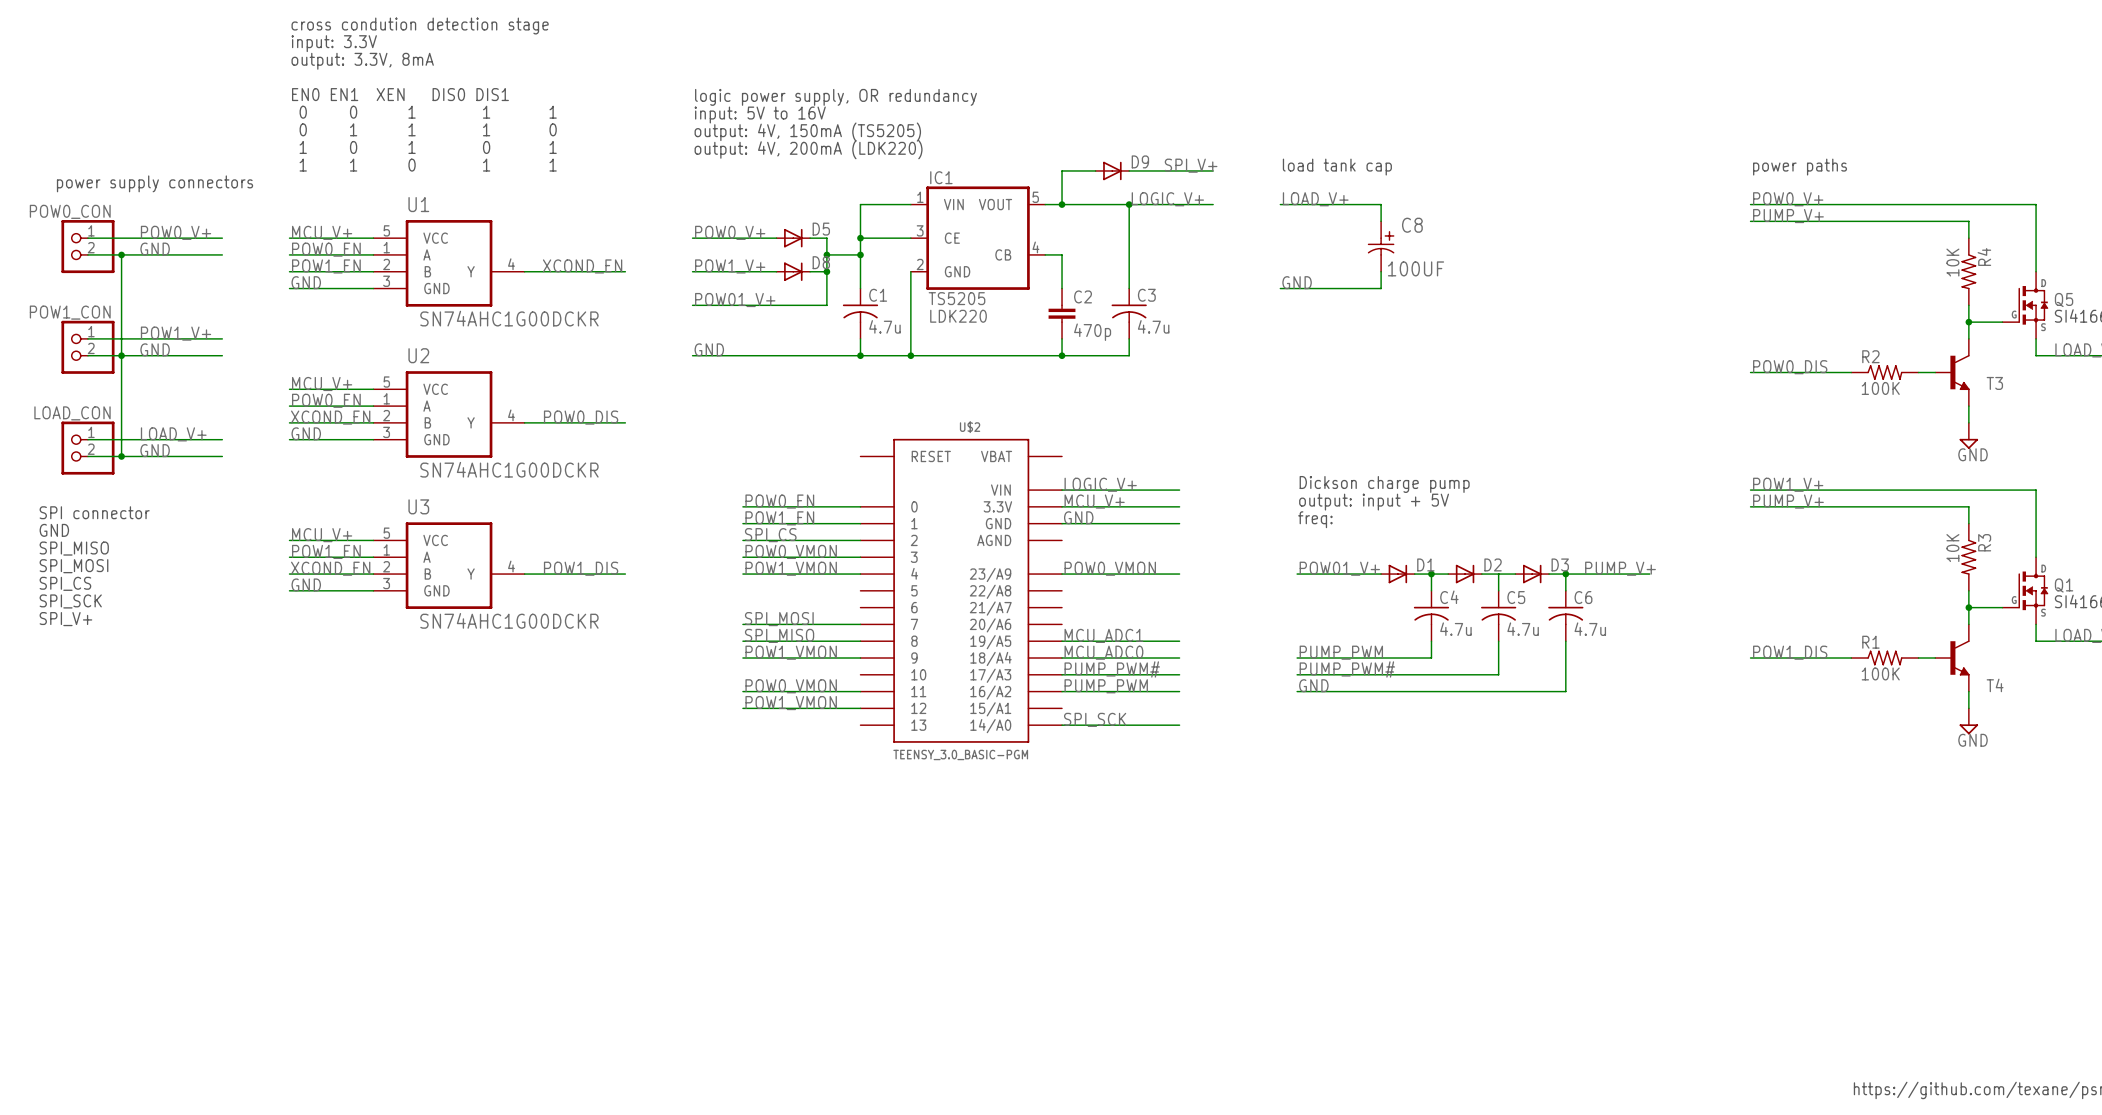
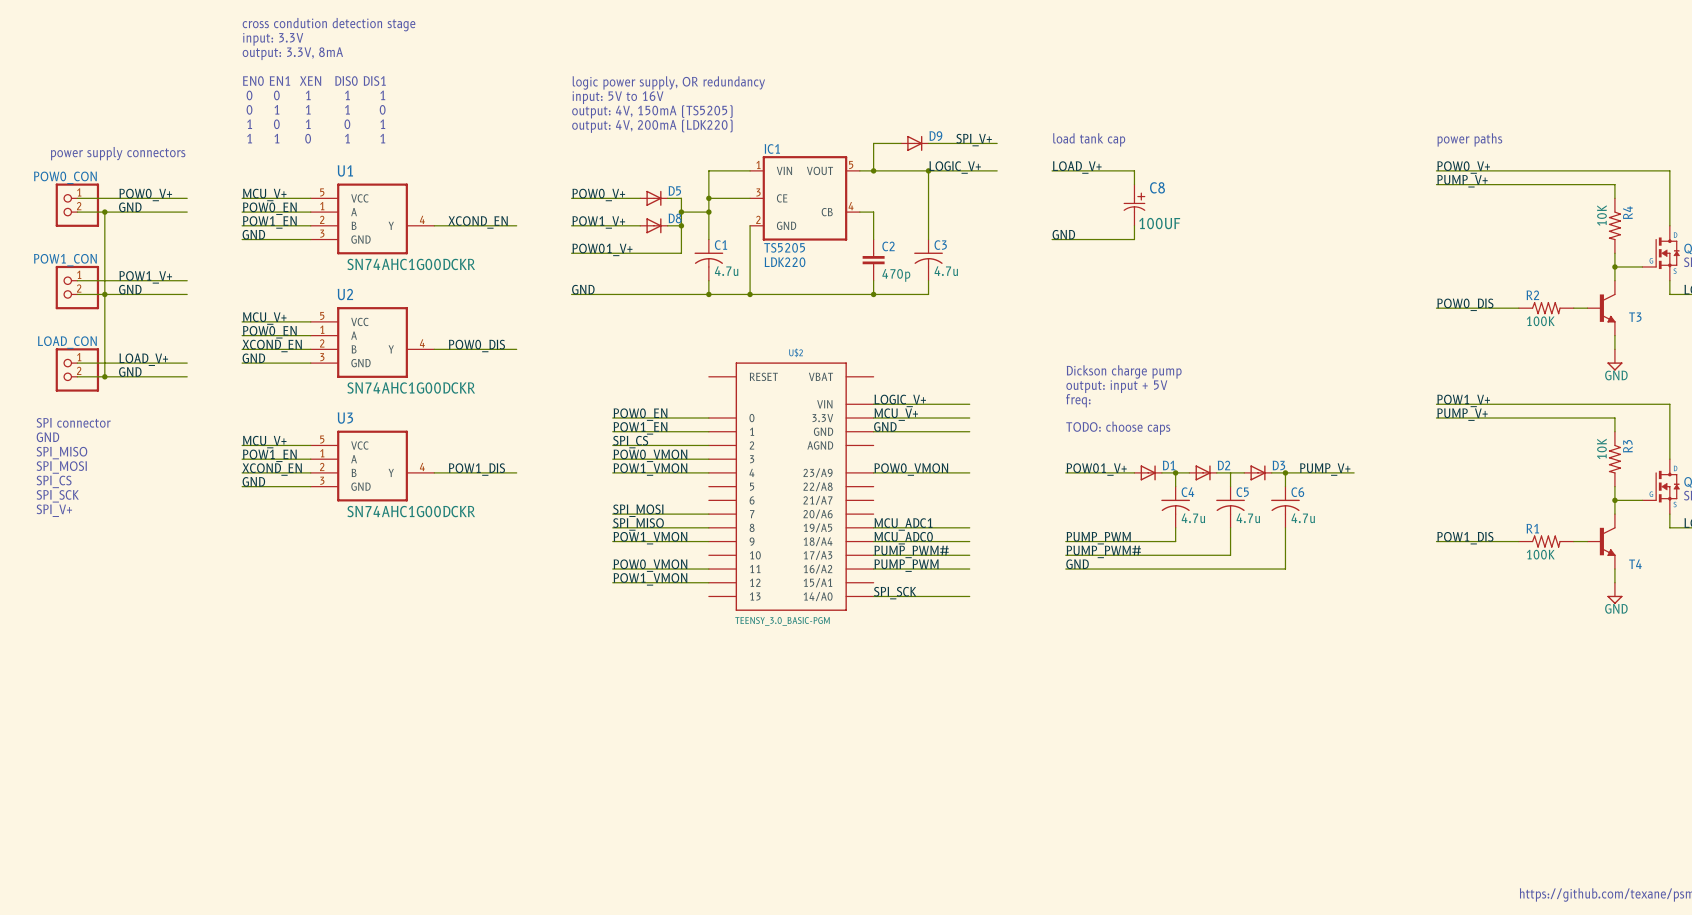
text: none -> Dickson charge pump (1124, 371)
text: Dickson charge pump (1384, 484) -> freq: (1078, 400)
text position: output: input + 5V (1374, 502) -> output: input + 5V (1116, 386)
text: freq: (1315, 519) -> TODO: choose caps (1118, 428)

